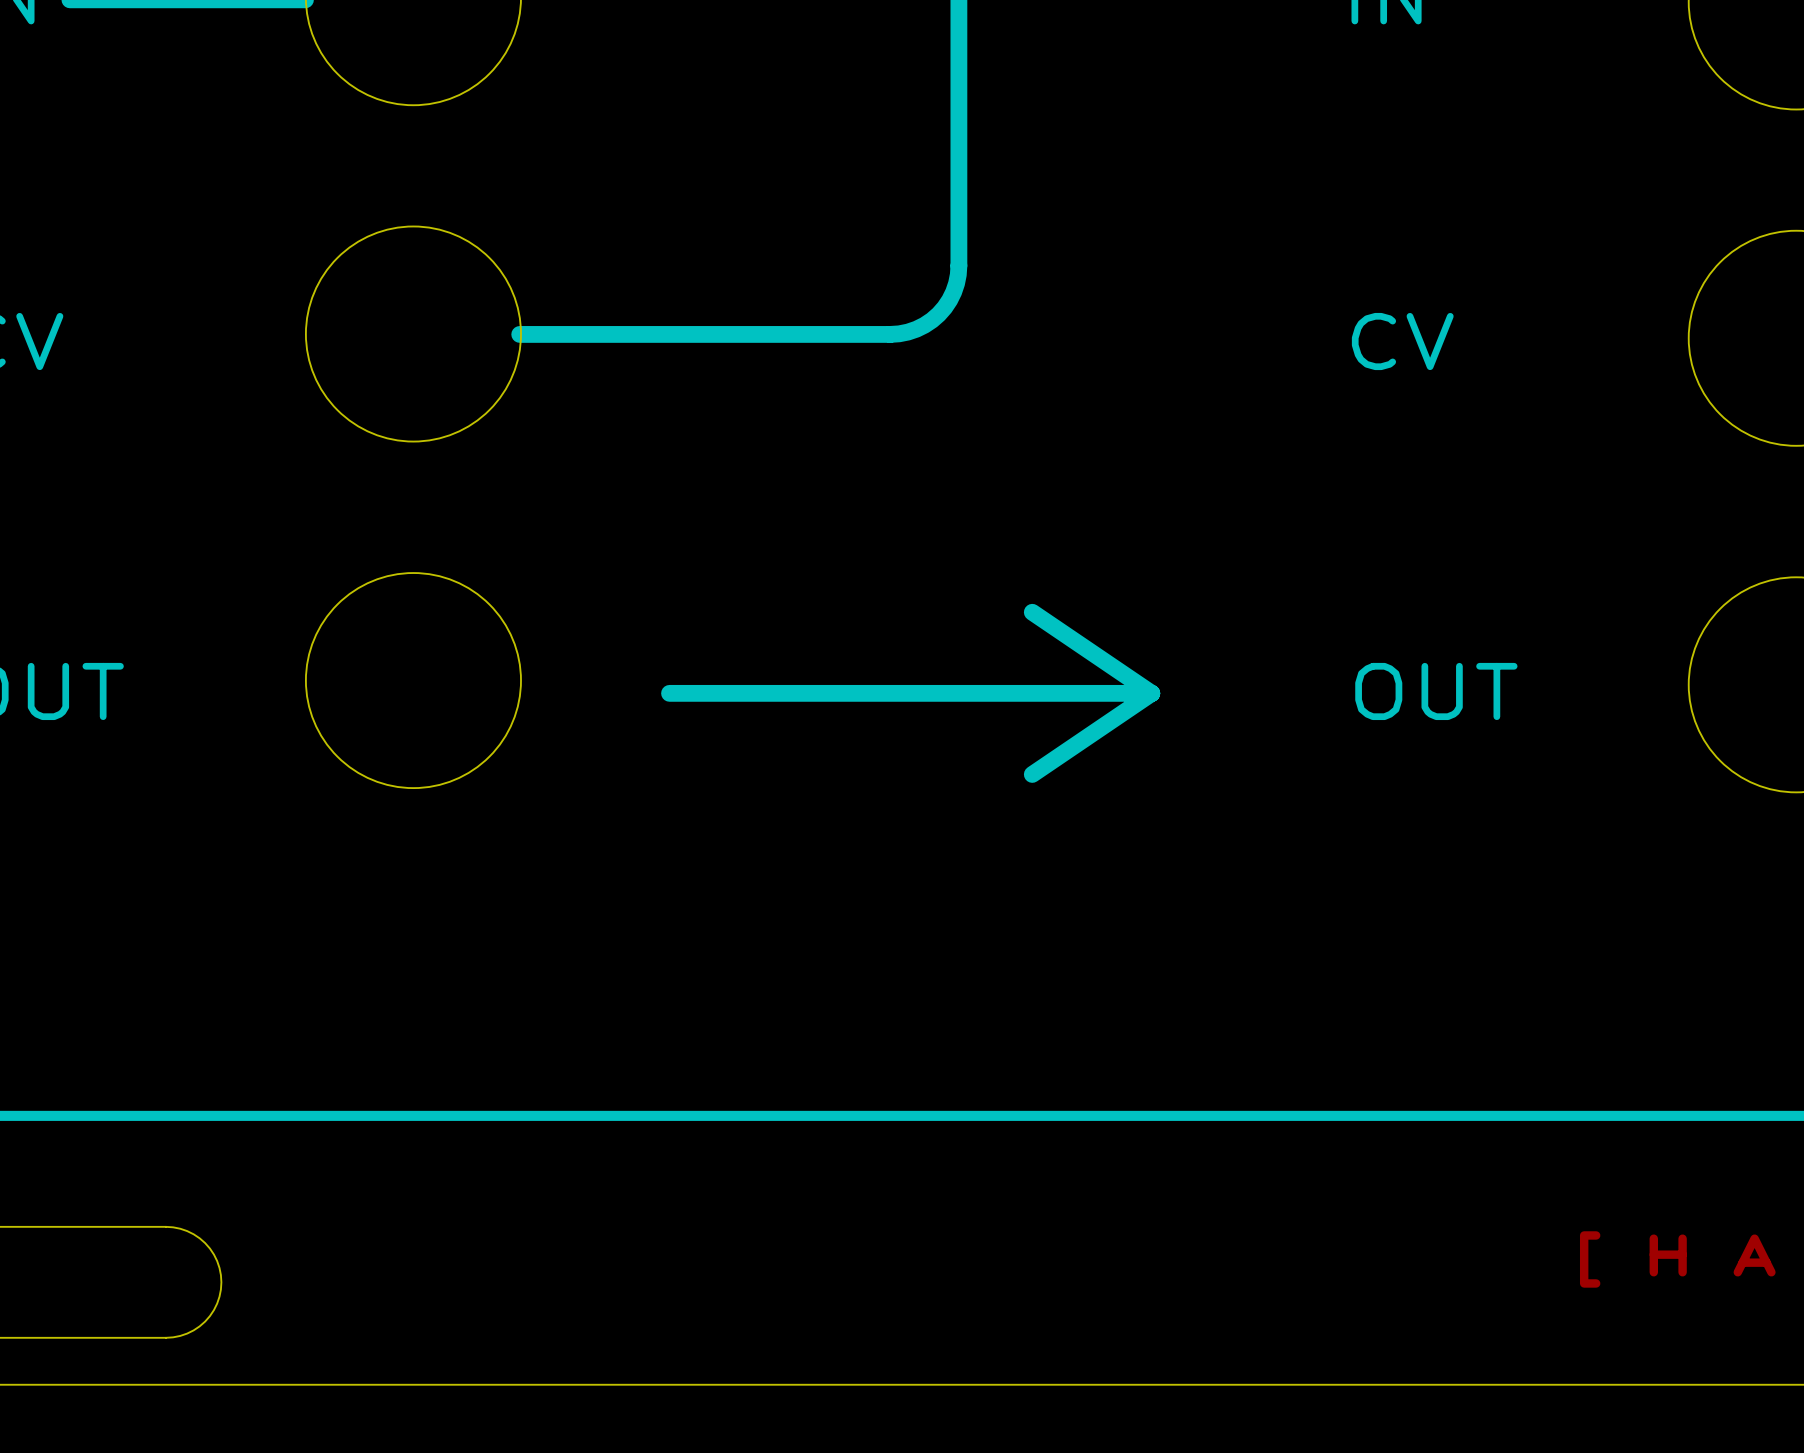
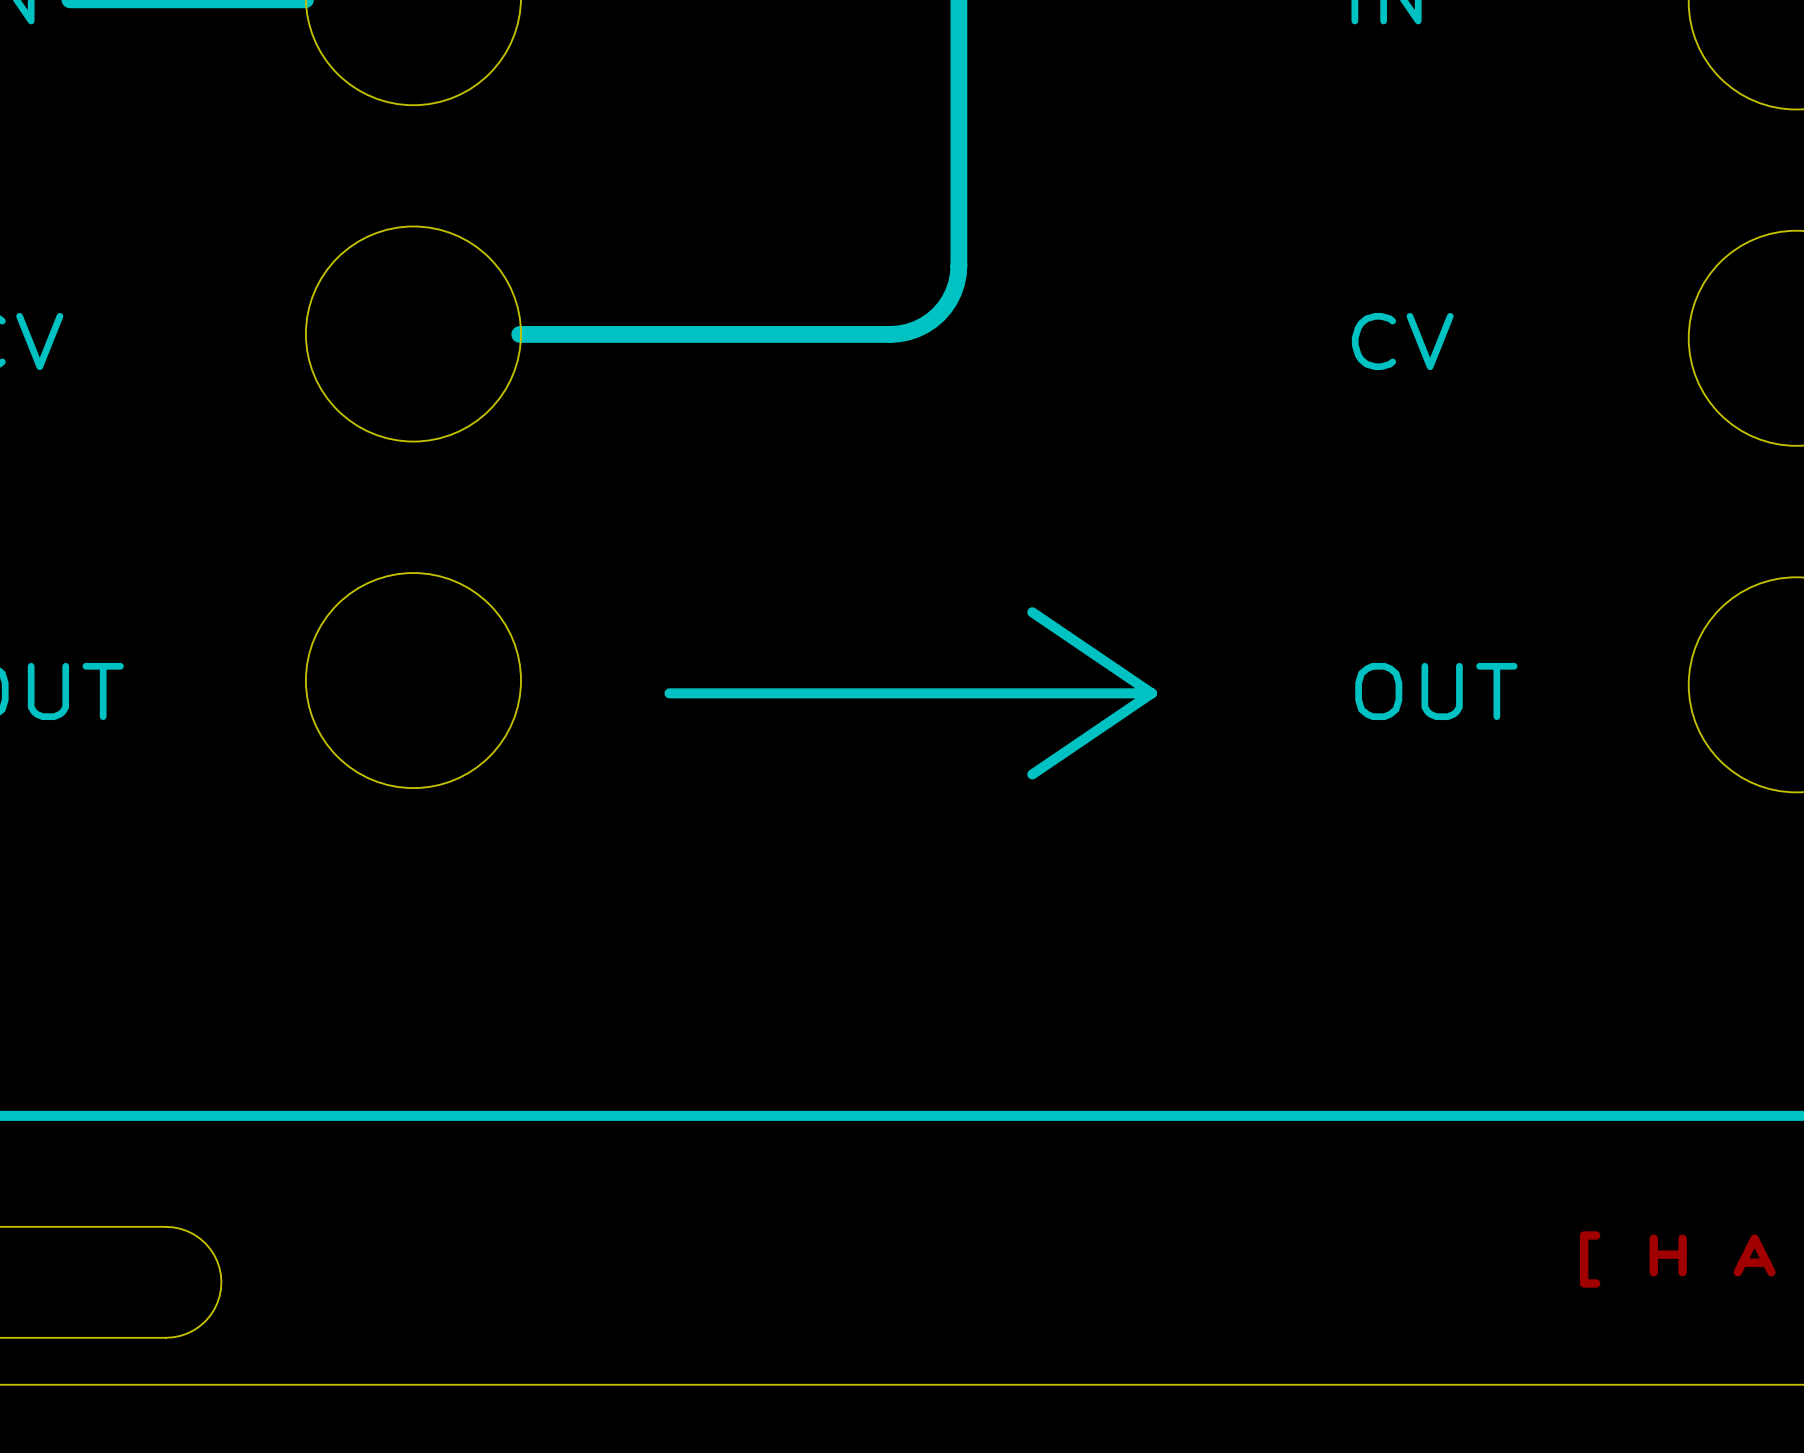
line width: thick (1032, 612) (1151, 693) -> thin (1032, 612) (1151, 693)
line width: thick (669, 693) (1151, 693) -> thin (669, 693) (1151, 693)
line width: thick (1151, 693) (1032, 774) -> thin (1151, 693) (1032, 774)

